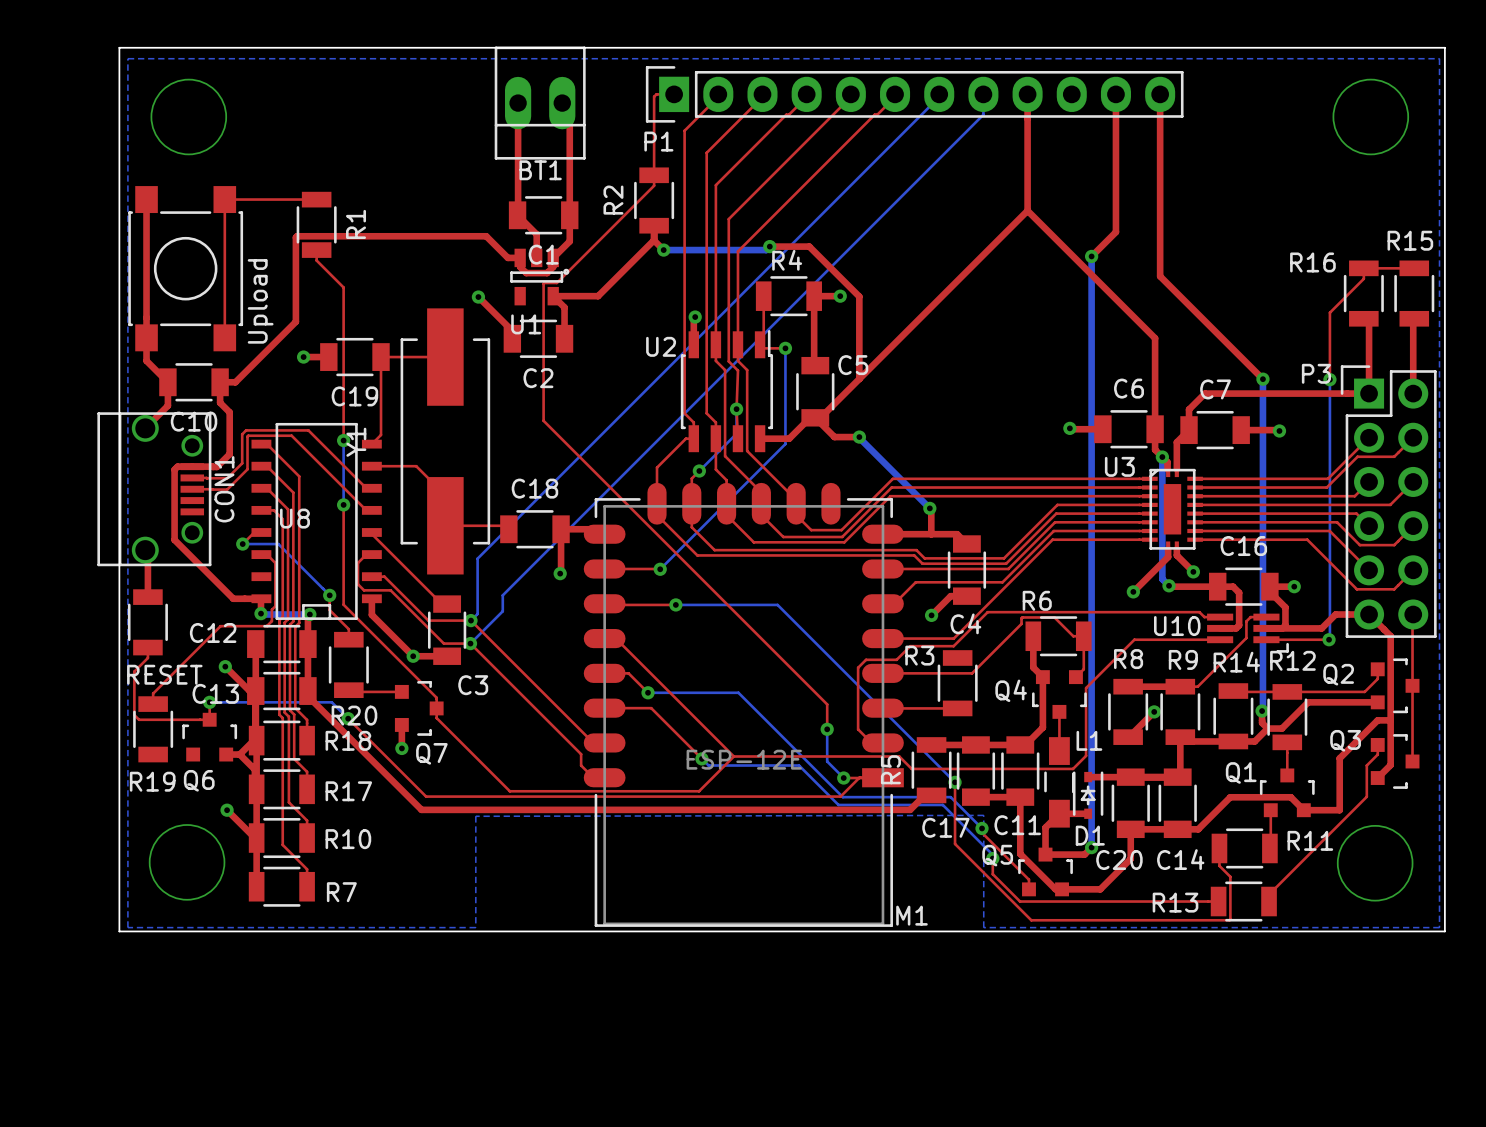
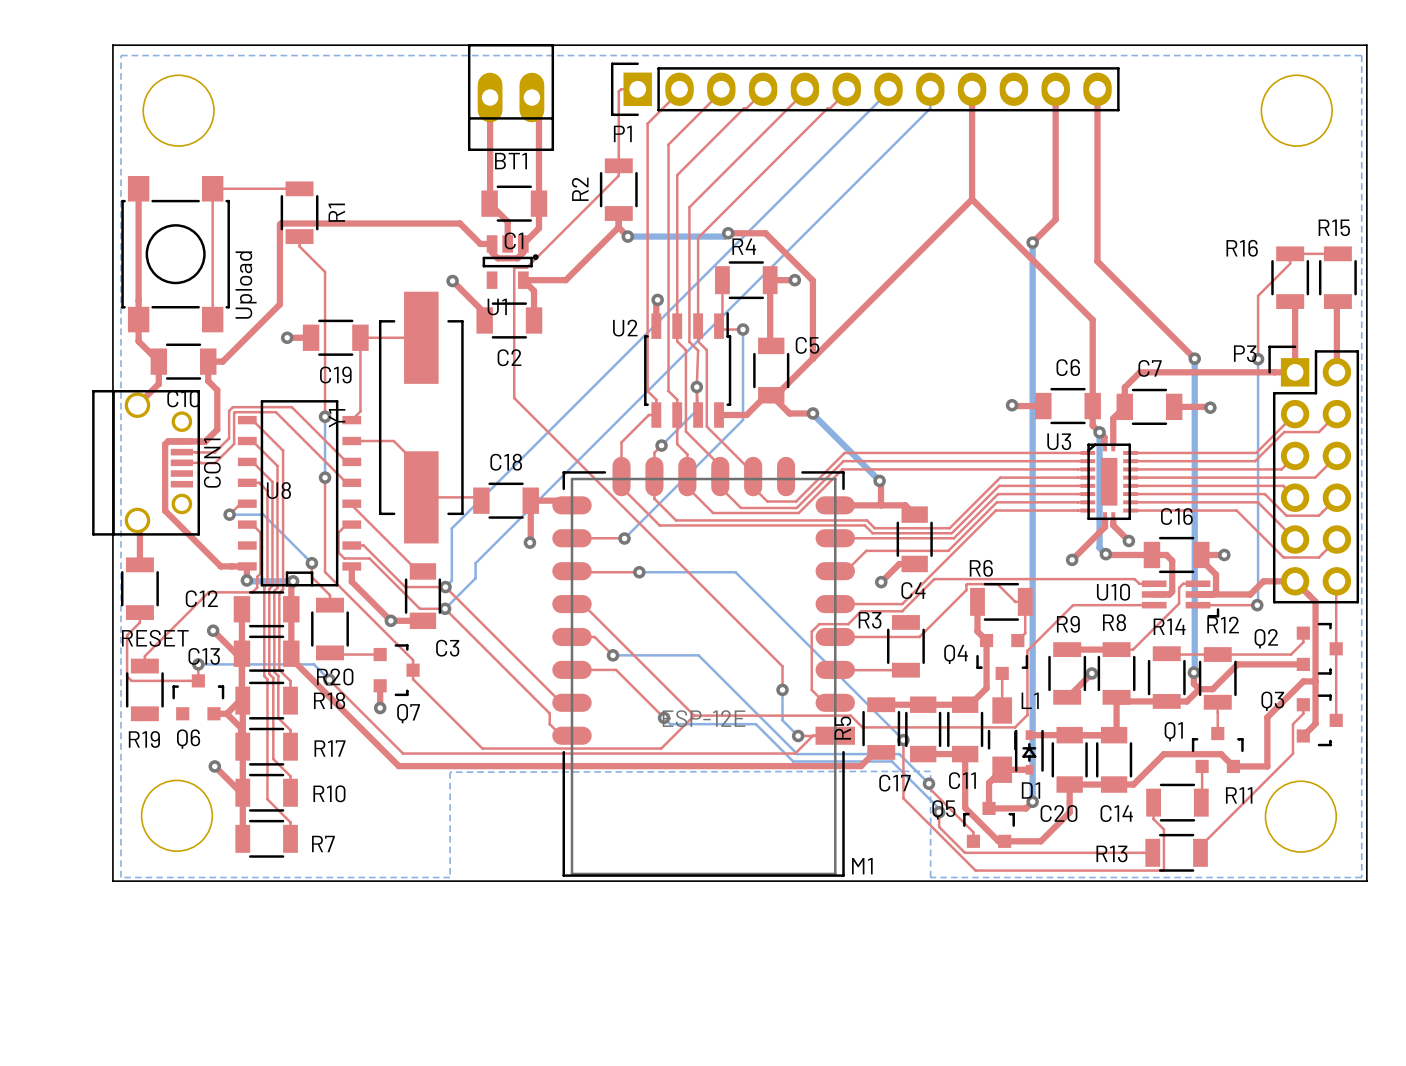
R8 name position: R8 (1128, 659) -> R8 (1114, 622)
R9 name position: R9 (1183, 659) -> R9 (1068, 624)

